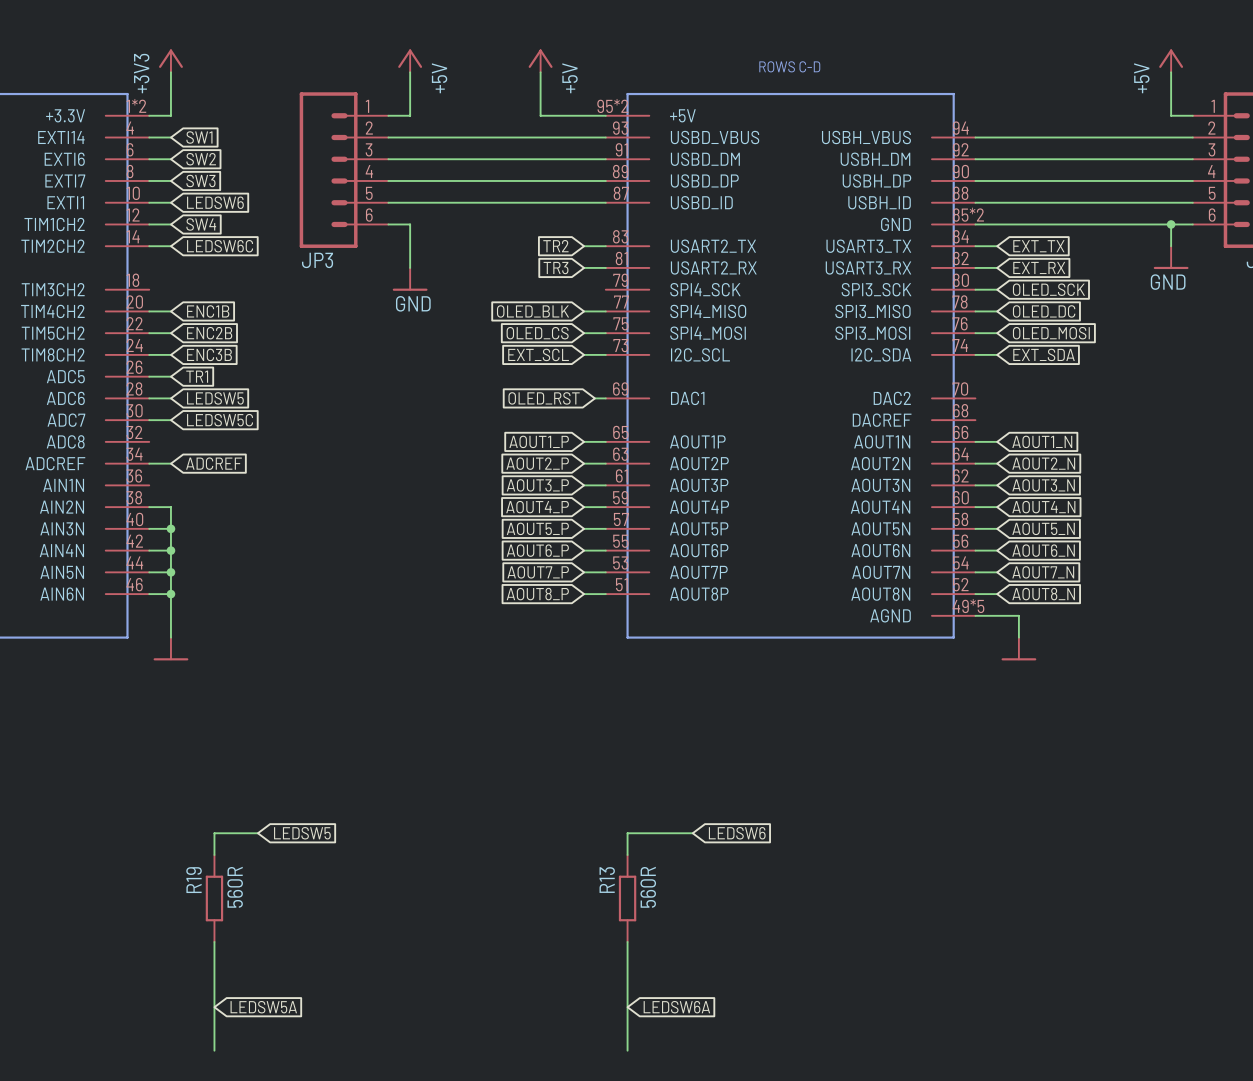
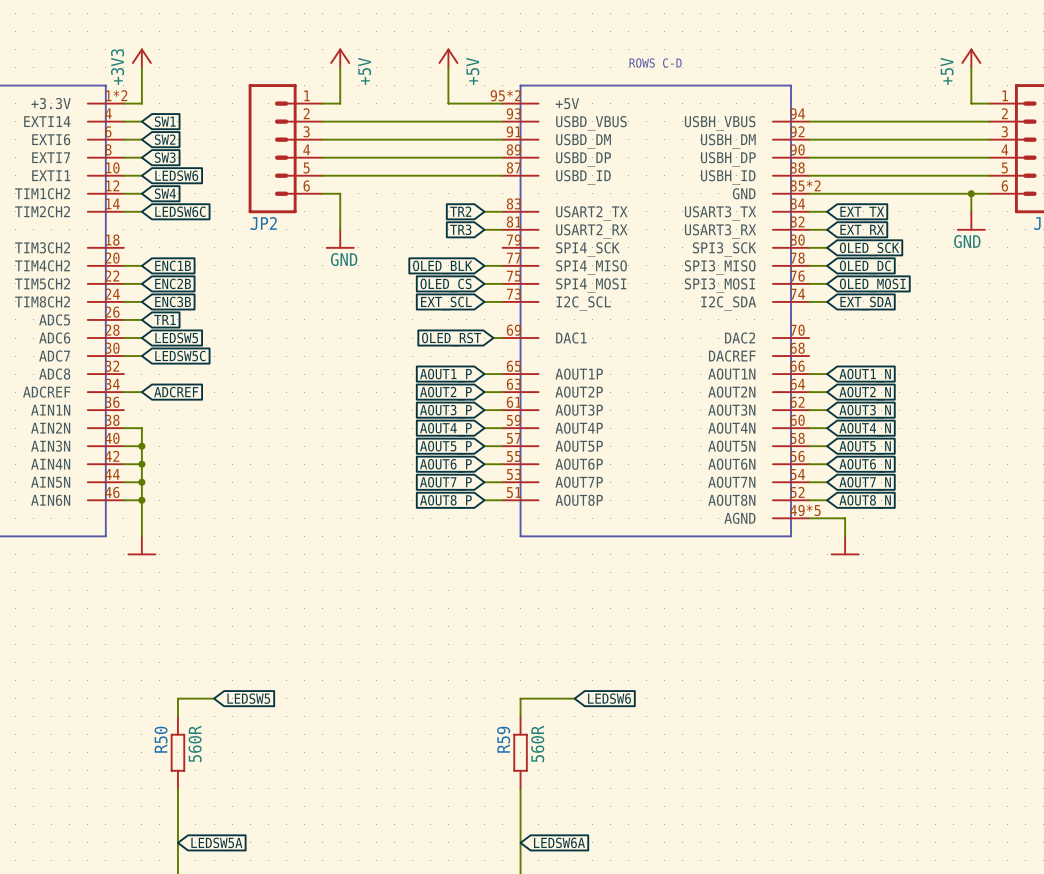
JP3 name: JP3 (317, 260) -> JP2 (263, 223)
R19 name: R19 (194, 880) -> R50 (161, 739)
R13 name: R13 (607, 880) -> R59 (503, 739)

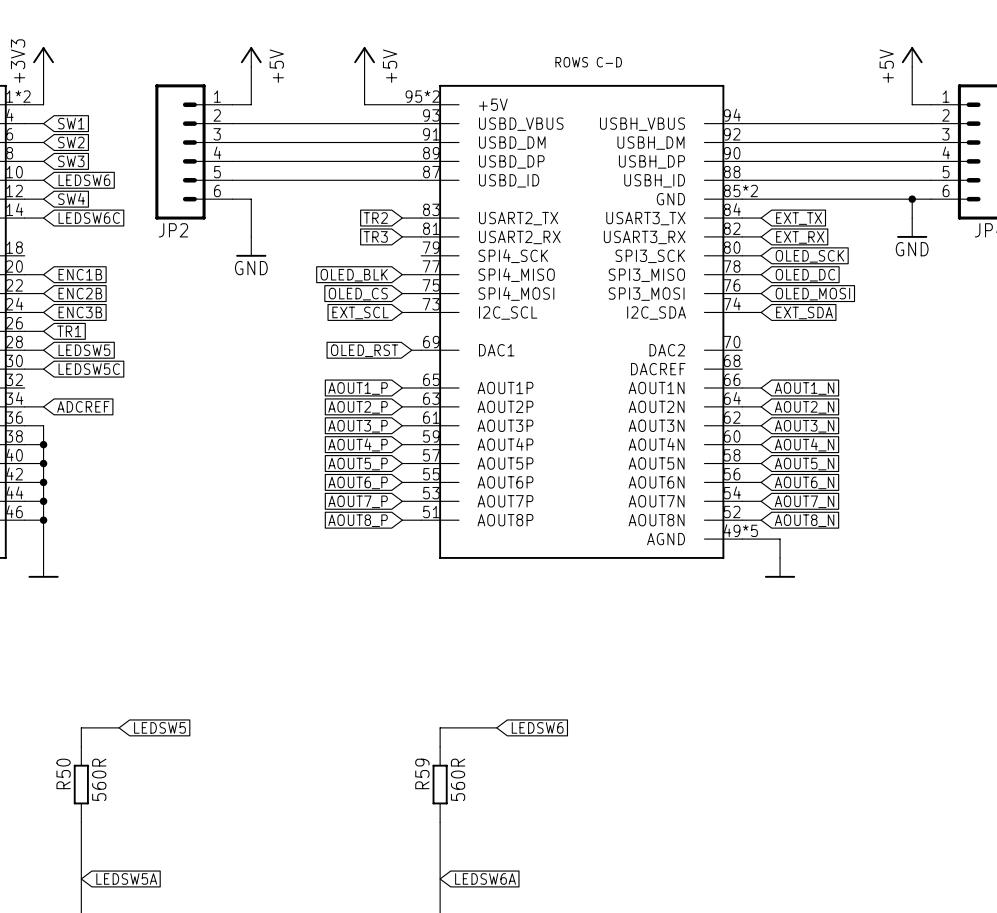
wire: none -> (24, 425) (43, 425) (43, 444)
junction: none -> (43, 444)

